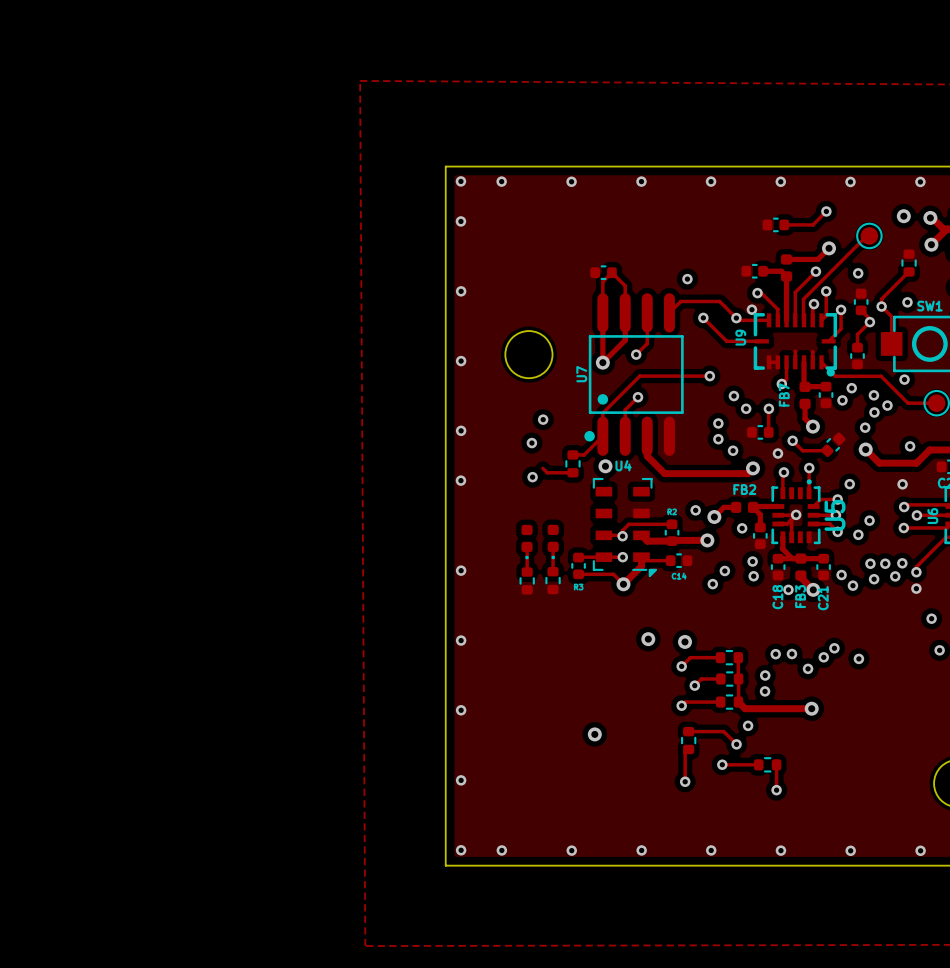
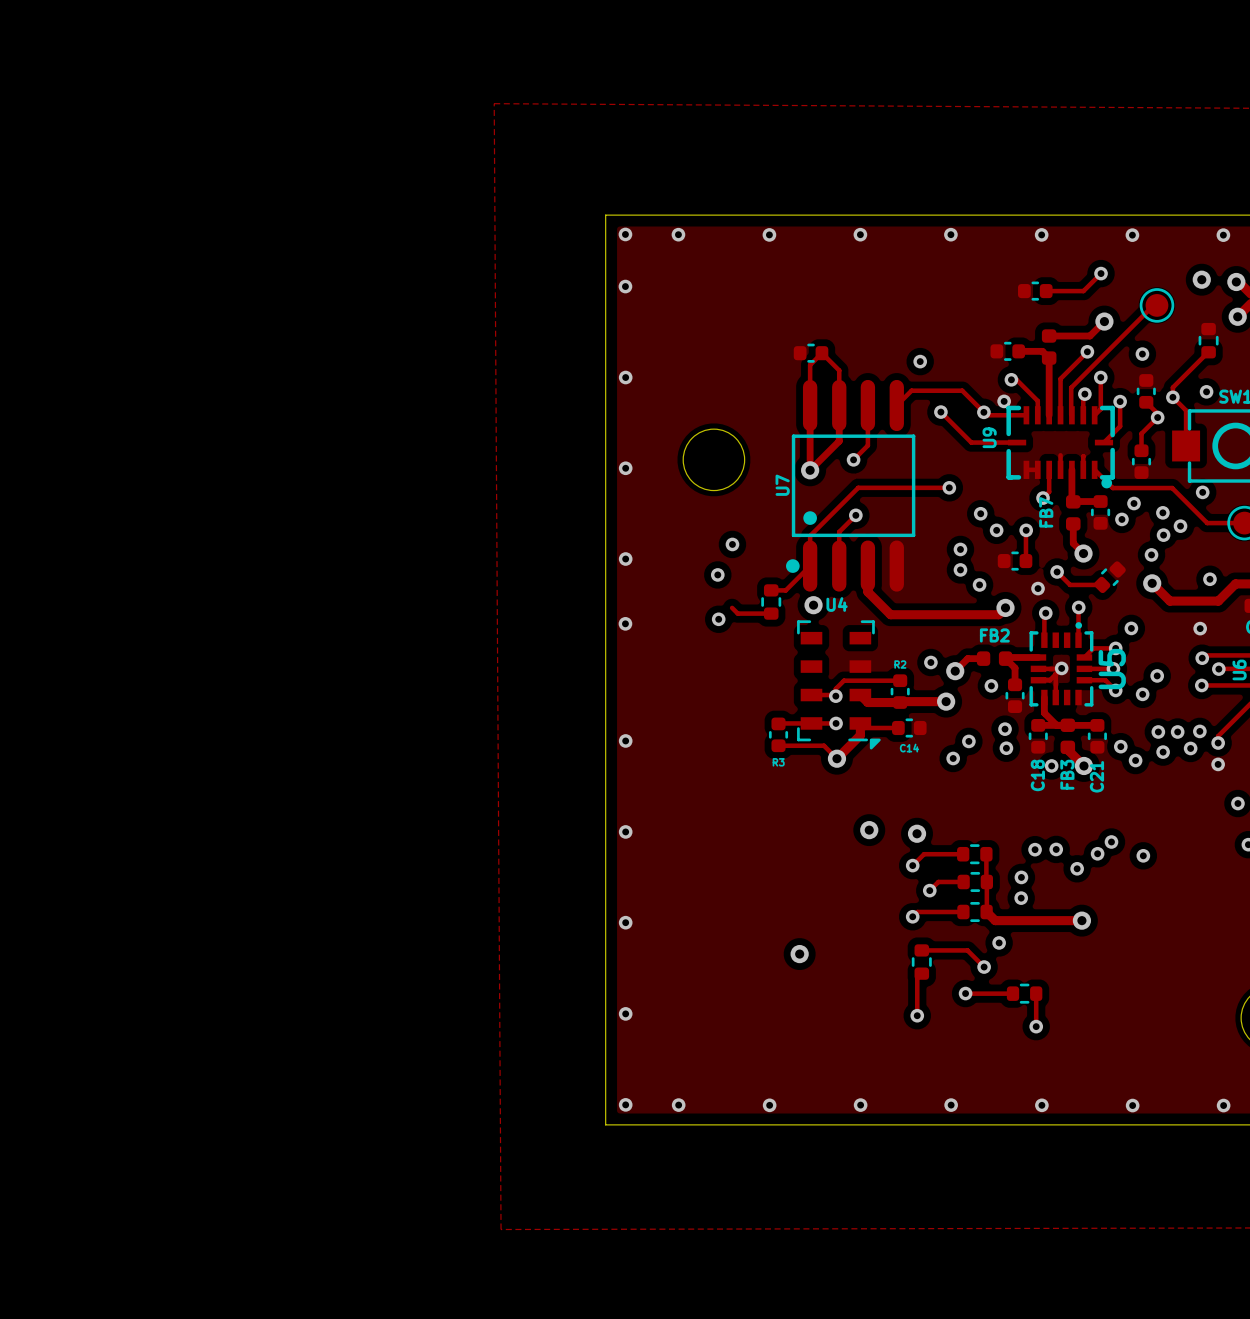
part: (553, 541) -> none
part: (527, 542) -> none
track: (527, 547) (527, 572) -> none
track: (553, 547) (553, 571) -> none
part: (527, 580) -> none
part: (553, 580) -> none

